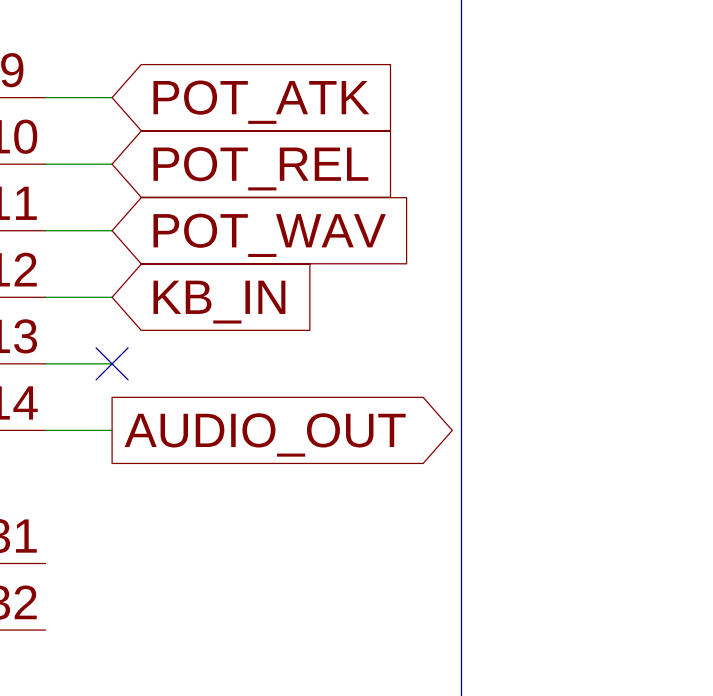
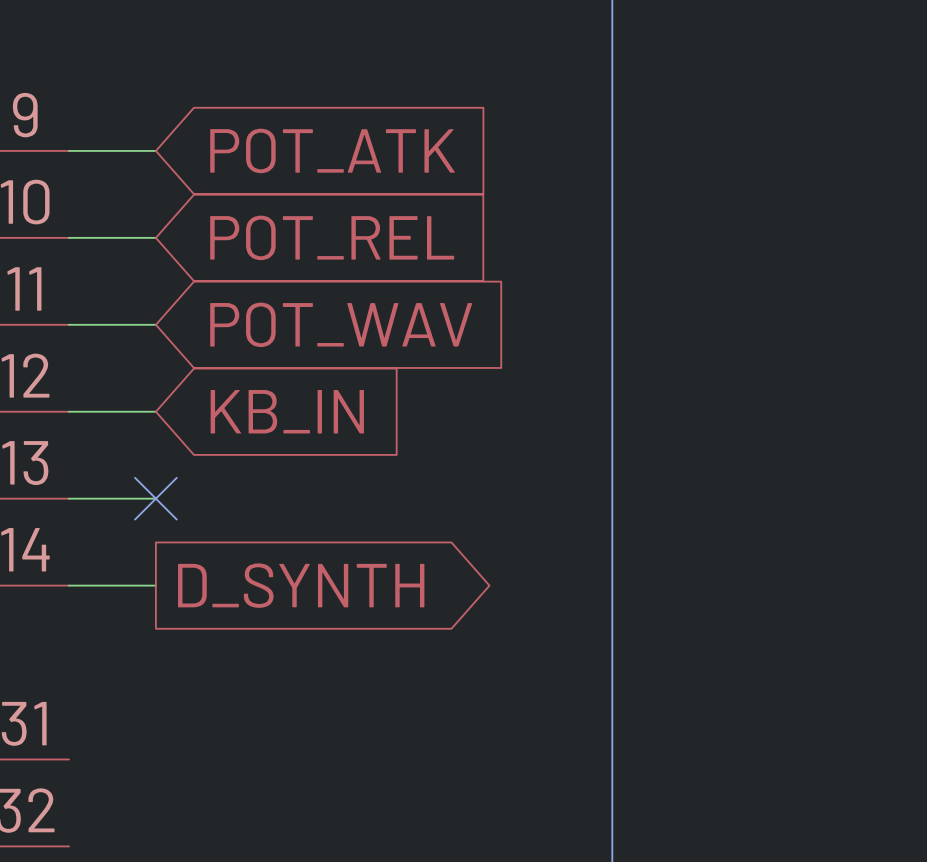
global label: AUDIO_OUT (265, 434) -> D_SYNTH (301, 585)

